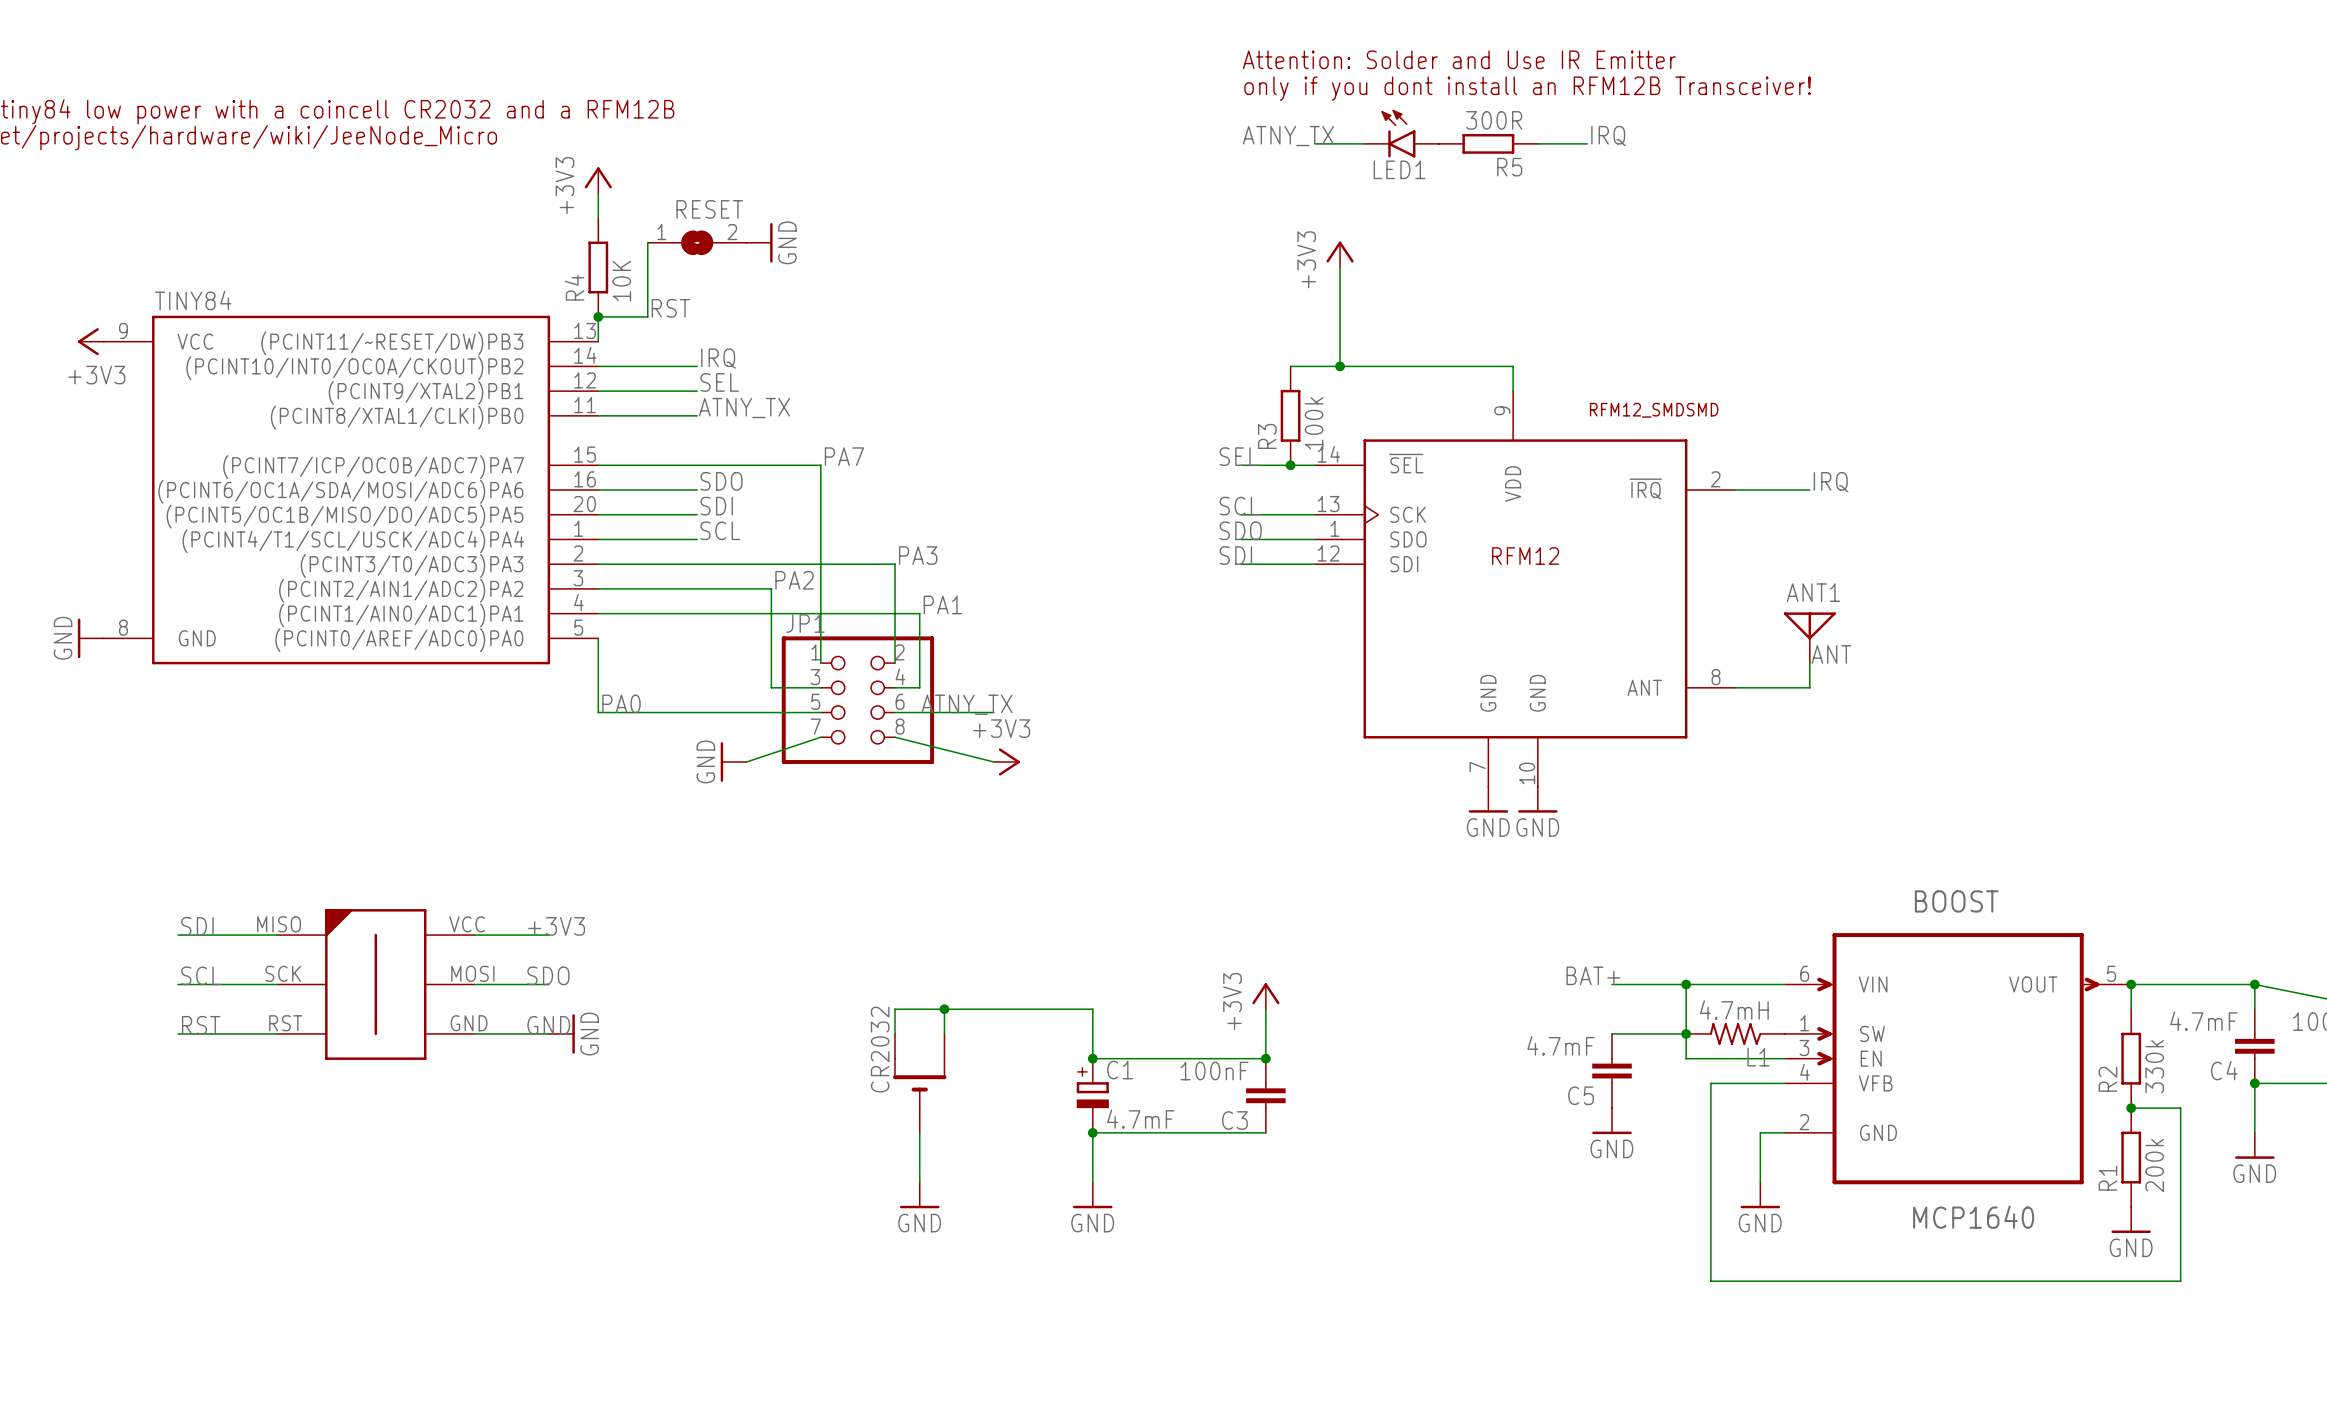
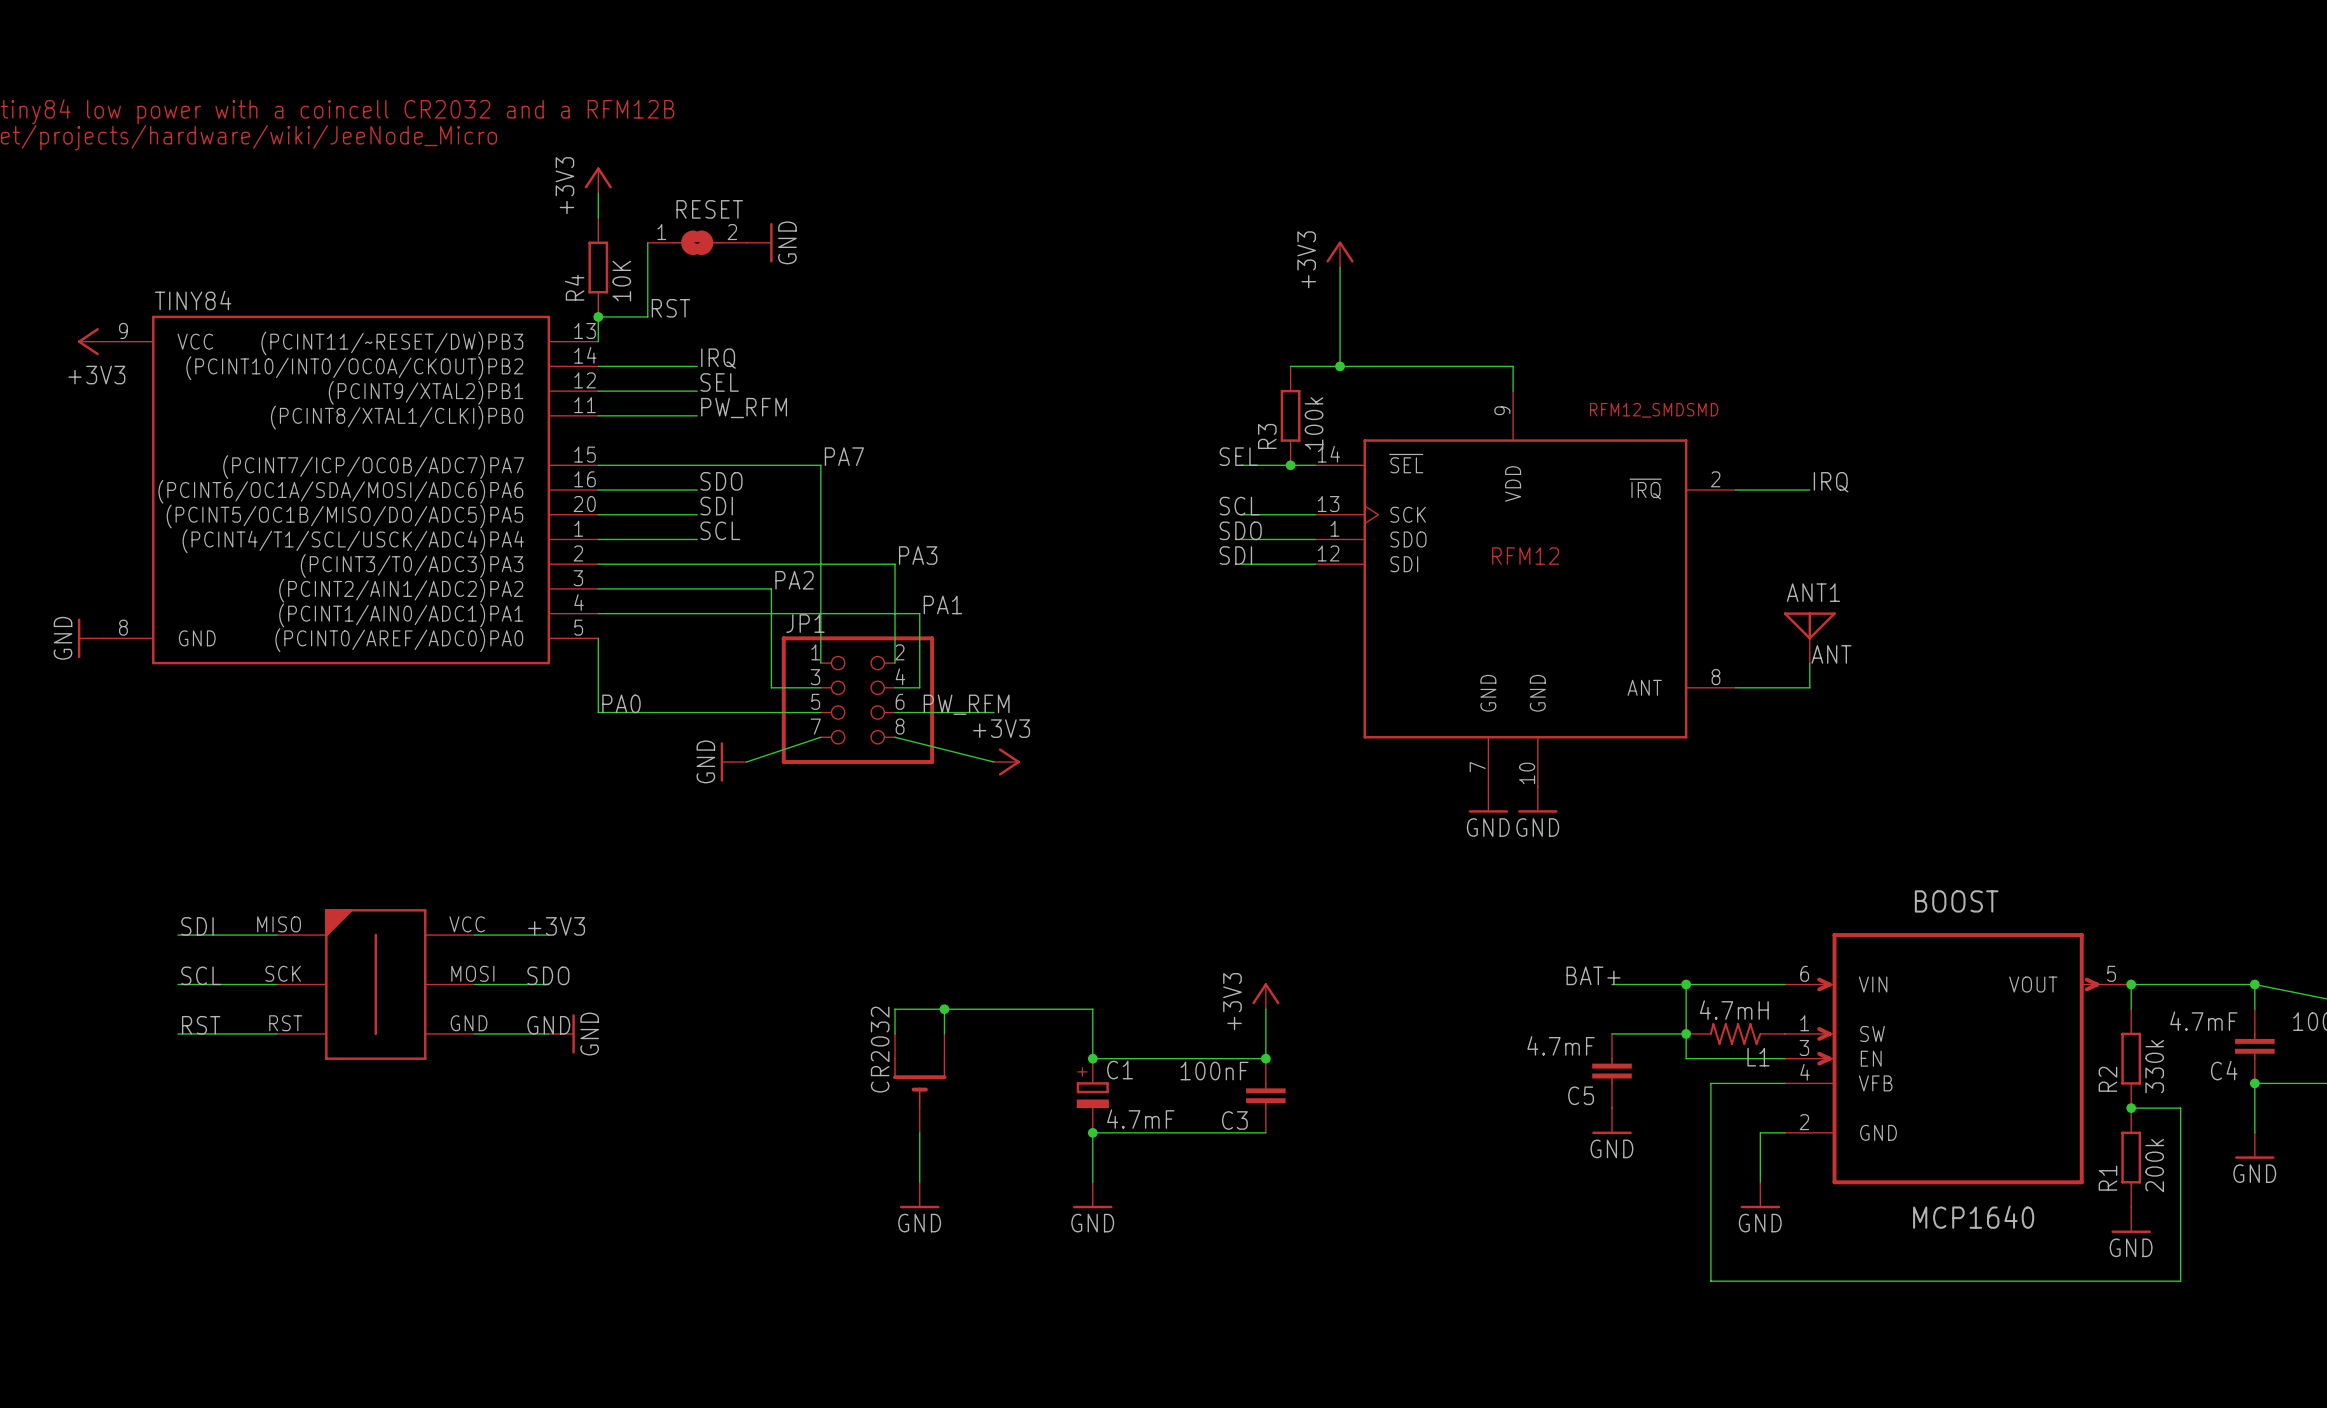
text: Attention: Solder and Use IR Emitter (1459, 59) -> none
text: only if you dont install an RFM12B Transceiver! (1527, 88) -> none
LED1: (1401, 133) -> none
label: ATNY_TX (1288, 136) -> none
label: IRQ (1608, 136) -> none
wire: (1315, 143) (1364, 143) -> none
R5: 300R (1488, 143) -> none
wire: (1537, 143) (1587, 143) -> none
label: ATNY_TX (744, 408) -> PW_RFM (744, 408)
label: ATNY_TX (966, 704) -> PW_RFM (966, 704)

